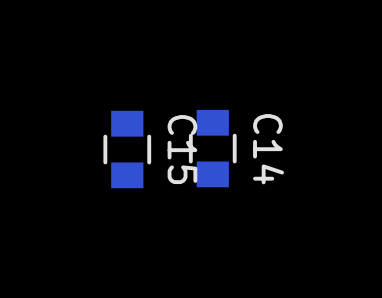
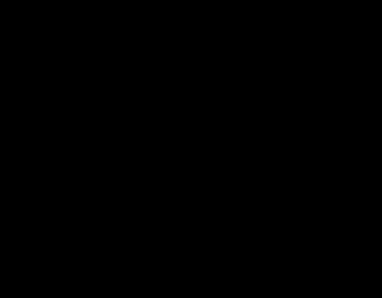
C14: (212, 148) -> none
C15: (127, 149) -> none

